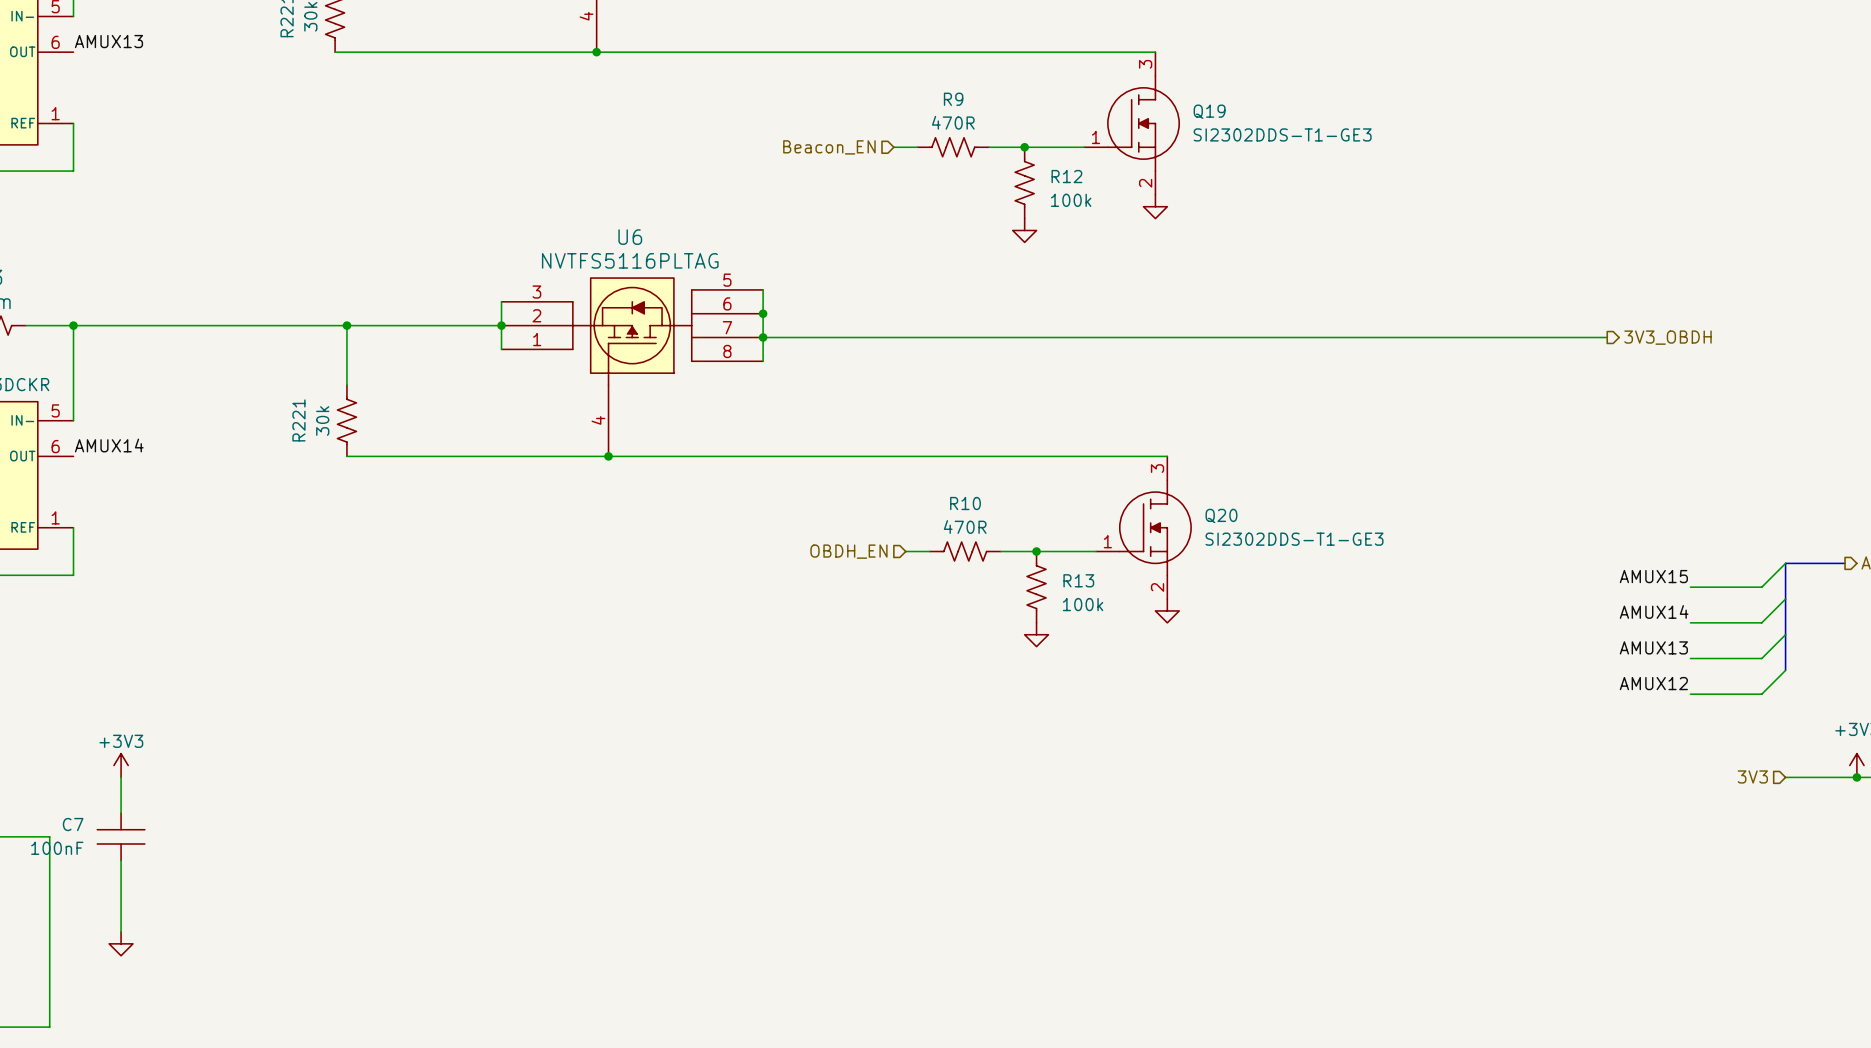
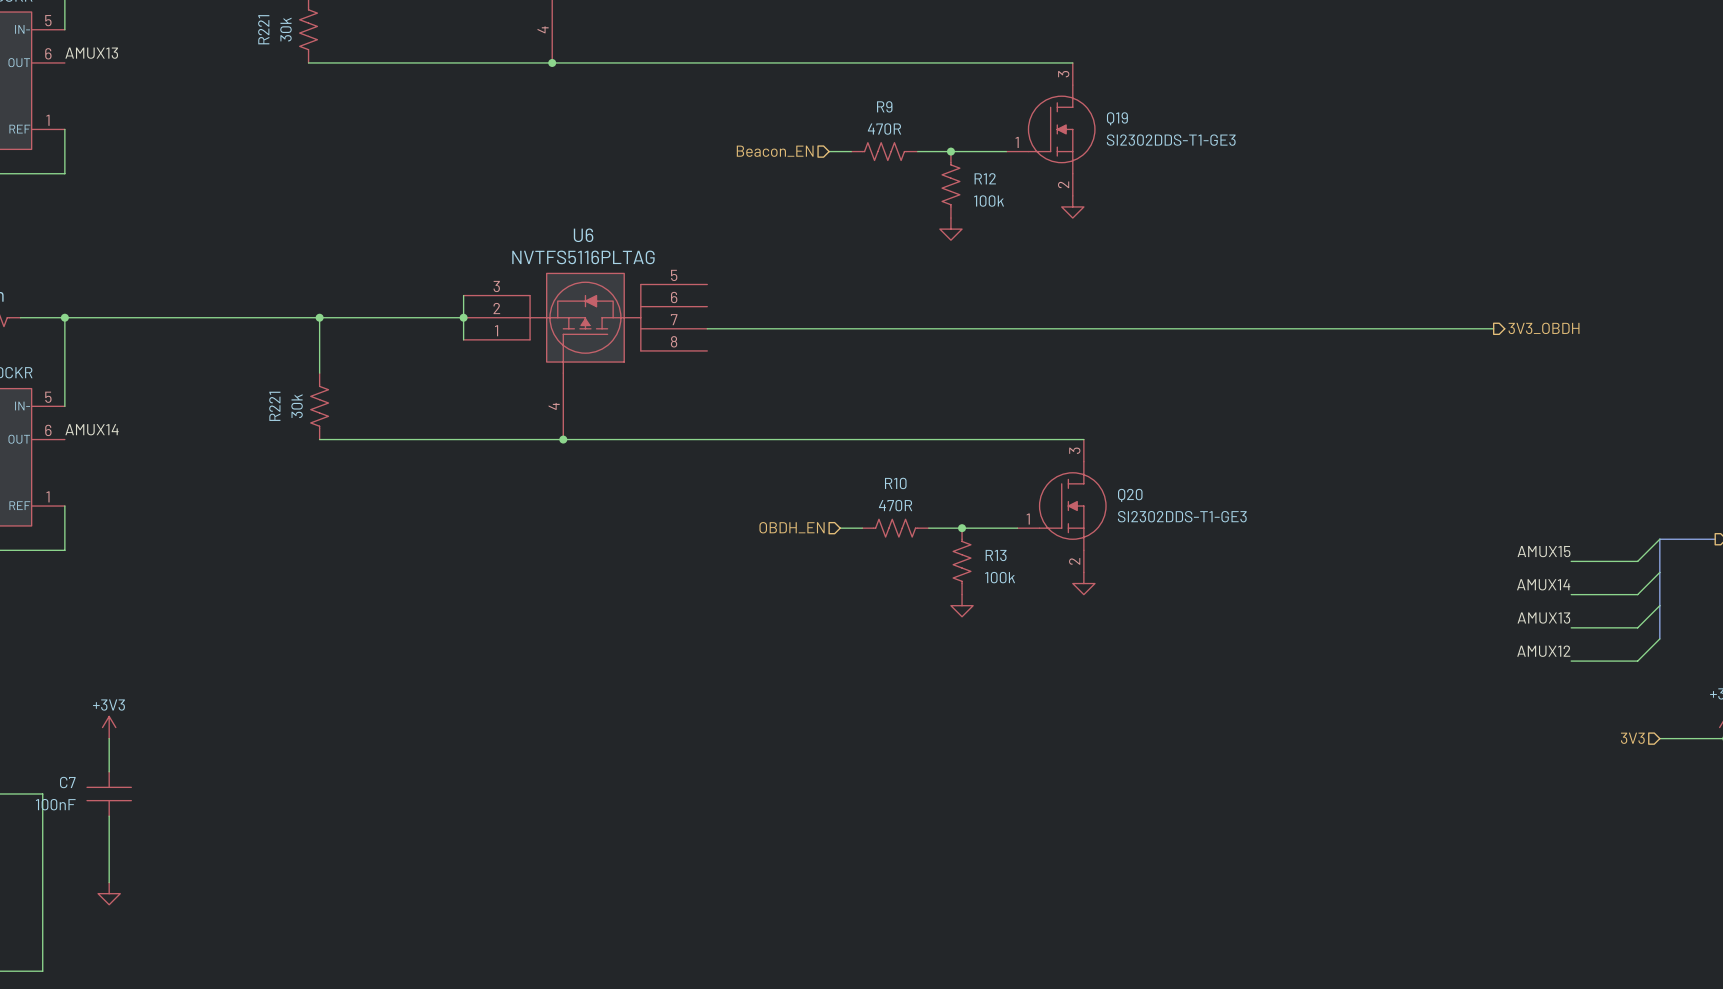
wire: (763, 289) (763, 361) -> none
junction: (763, 313) -> none
junction: (763, 337) -> none

